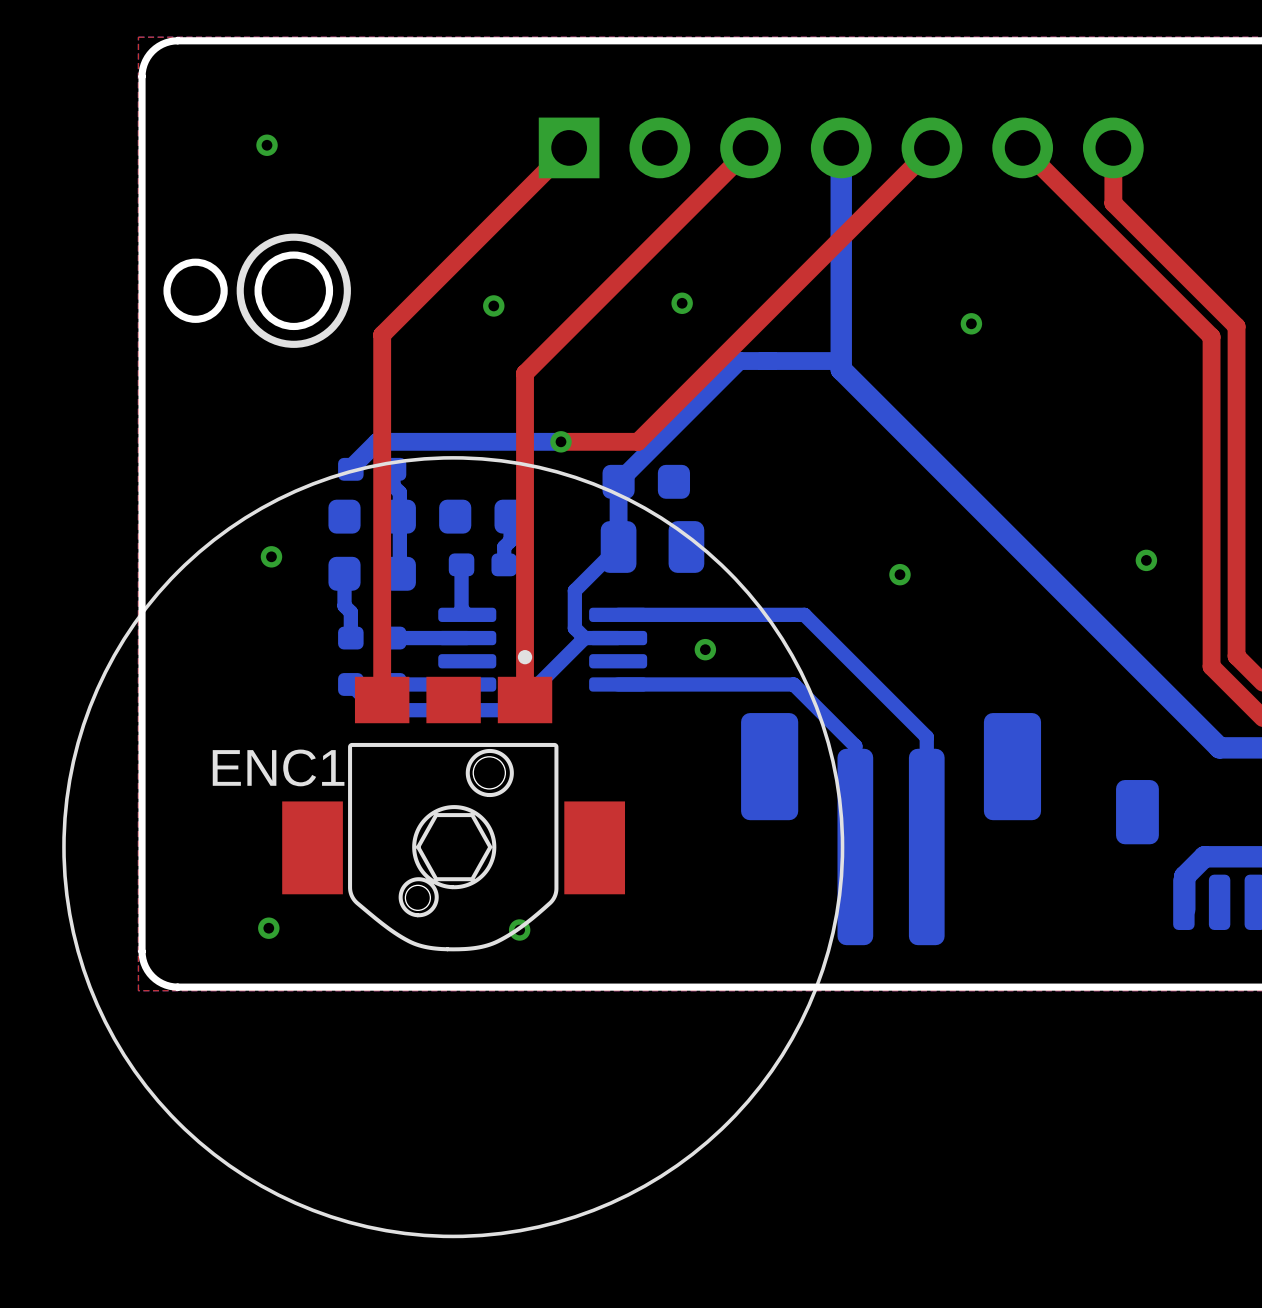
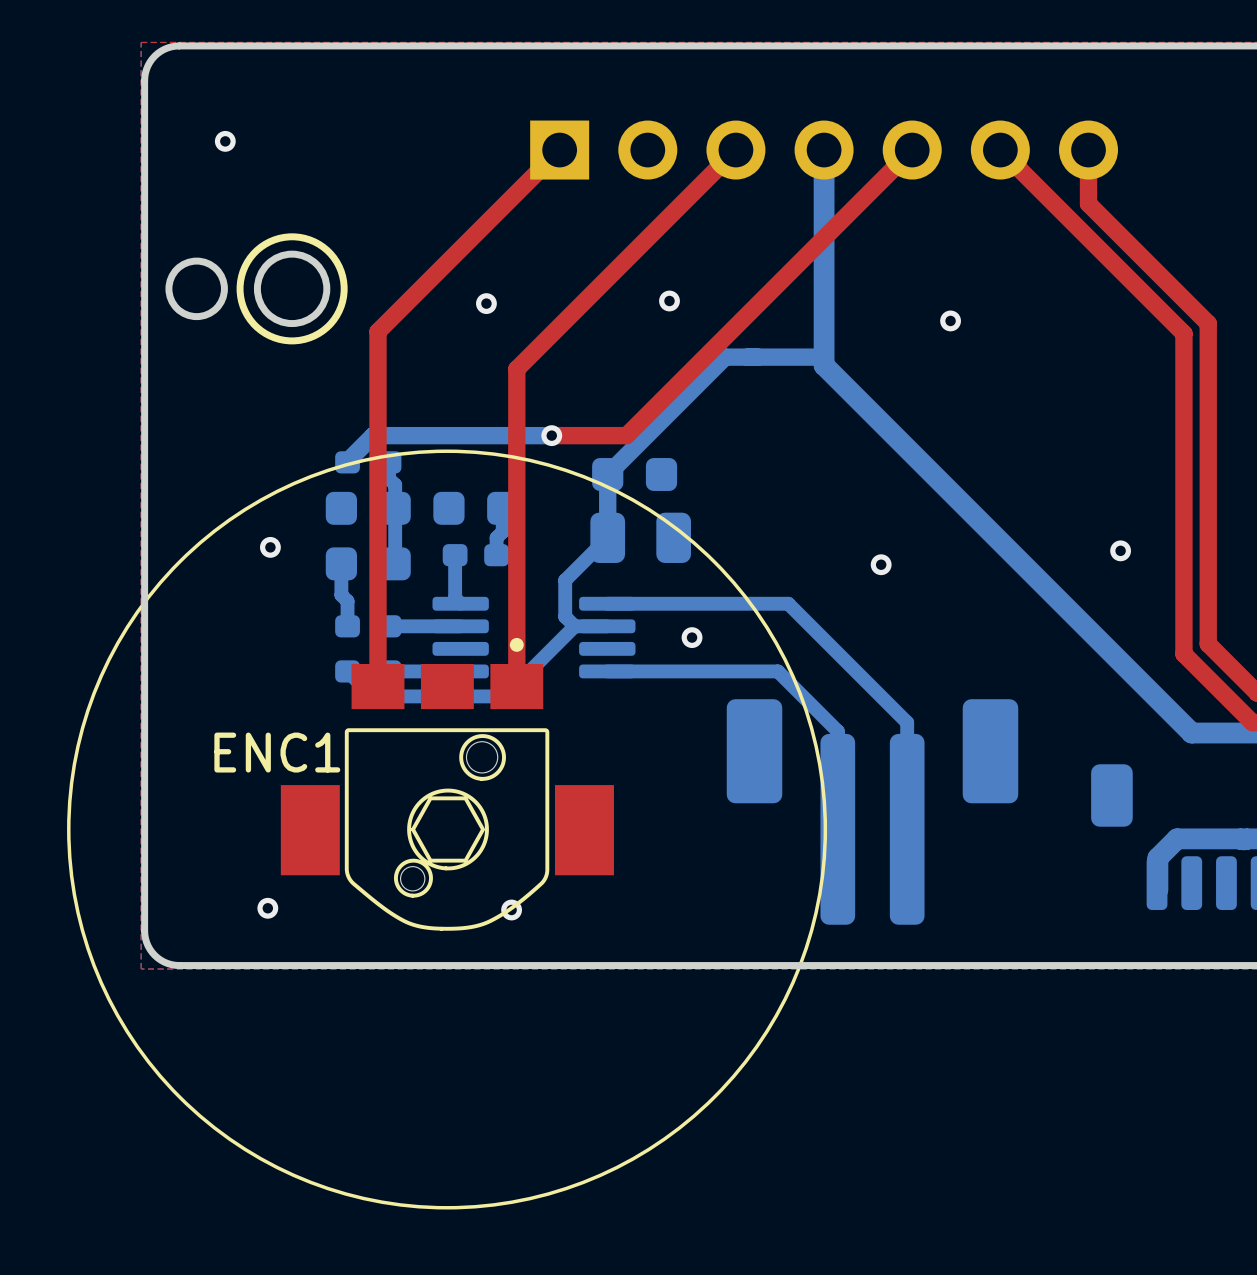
via position: (267, 145) -> (225, 141)

